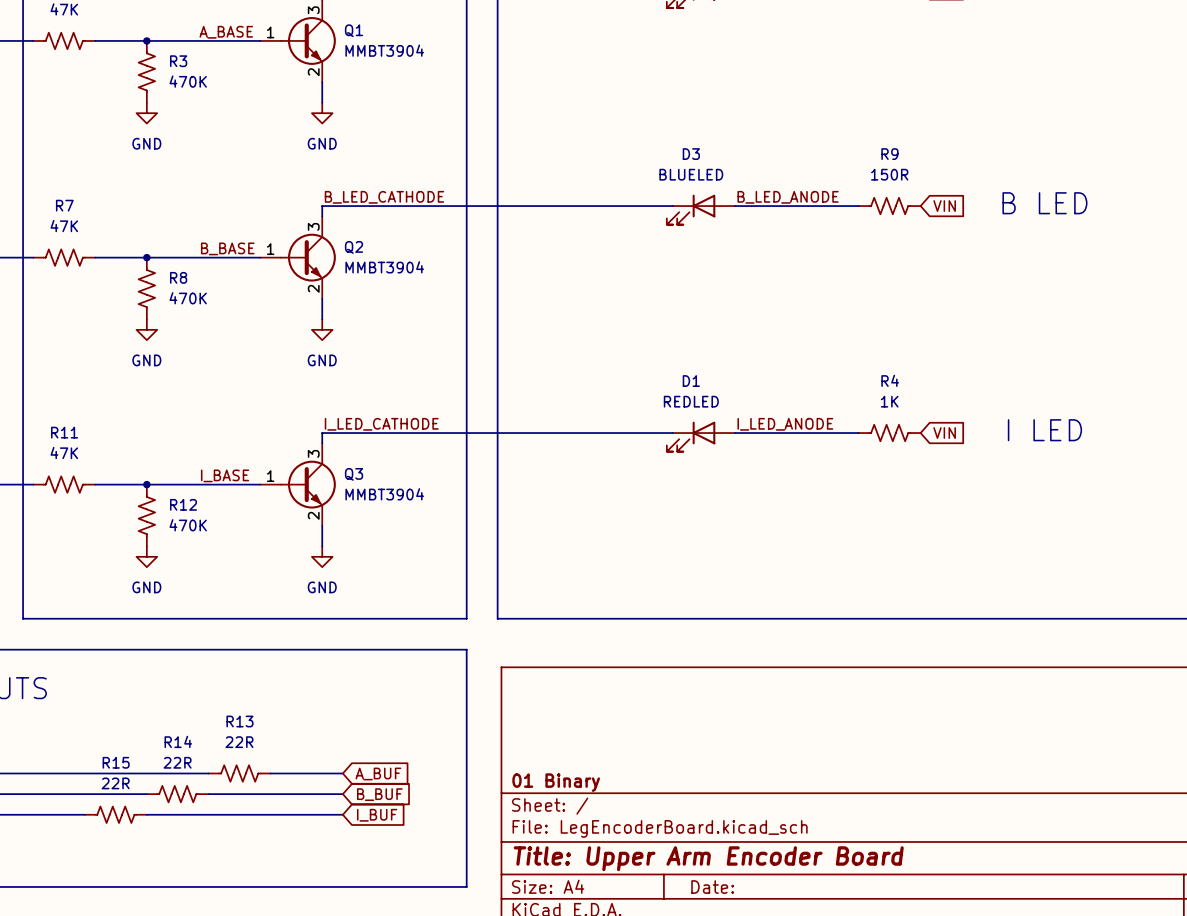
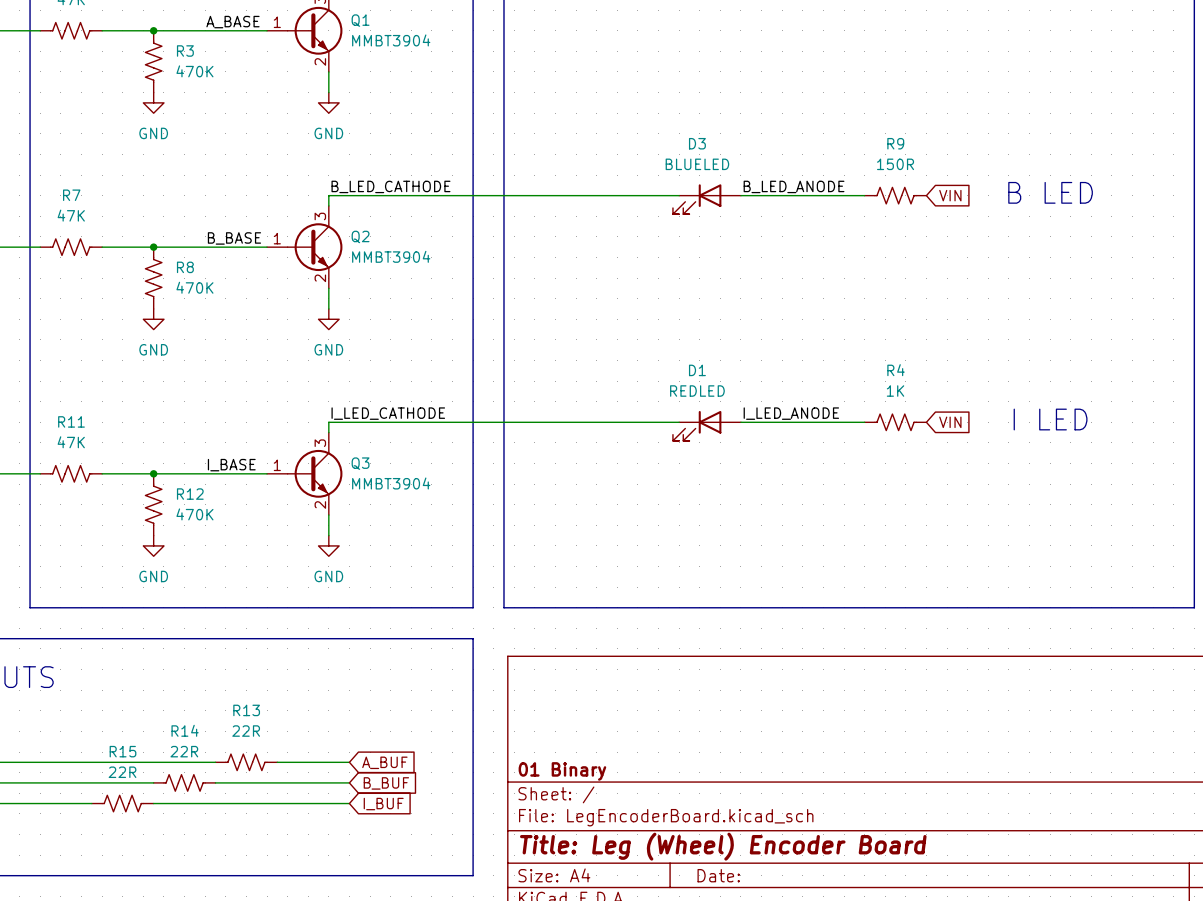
title block: Title: Upper Arm Encoder Board (708, 858) -> Title: Leg (Wheel) Encoder Board (723, 846)

